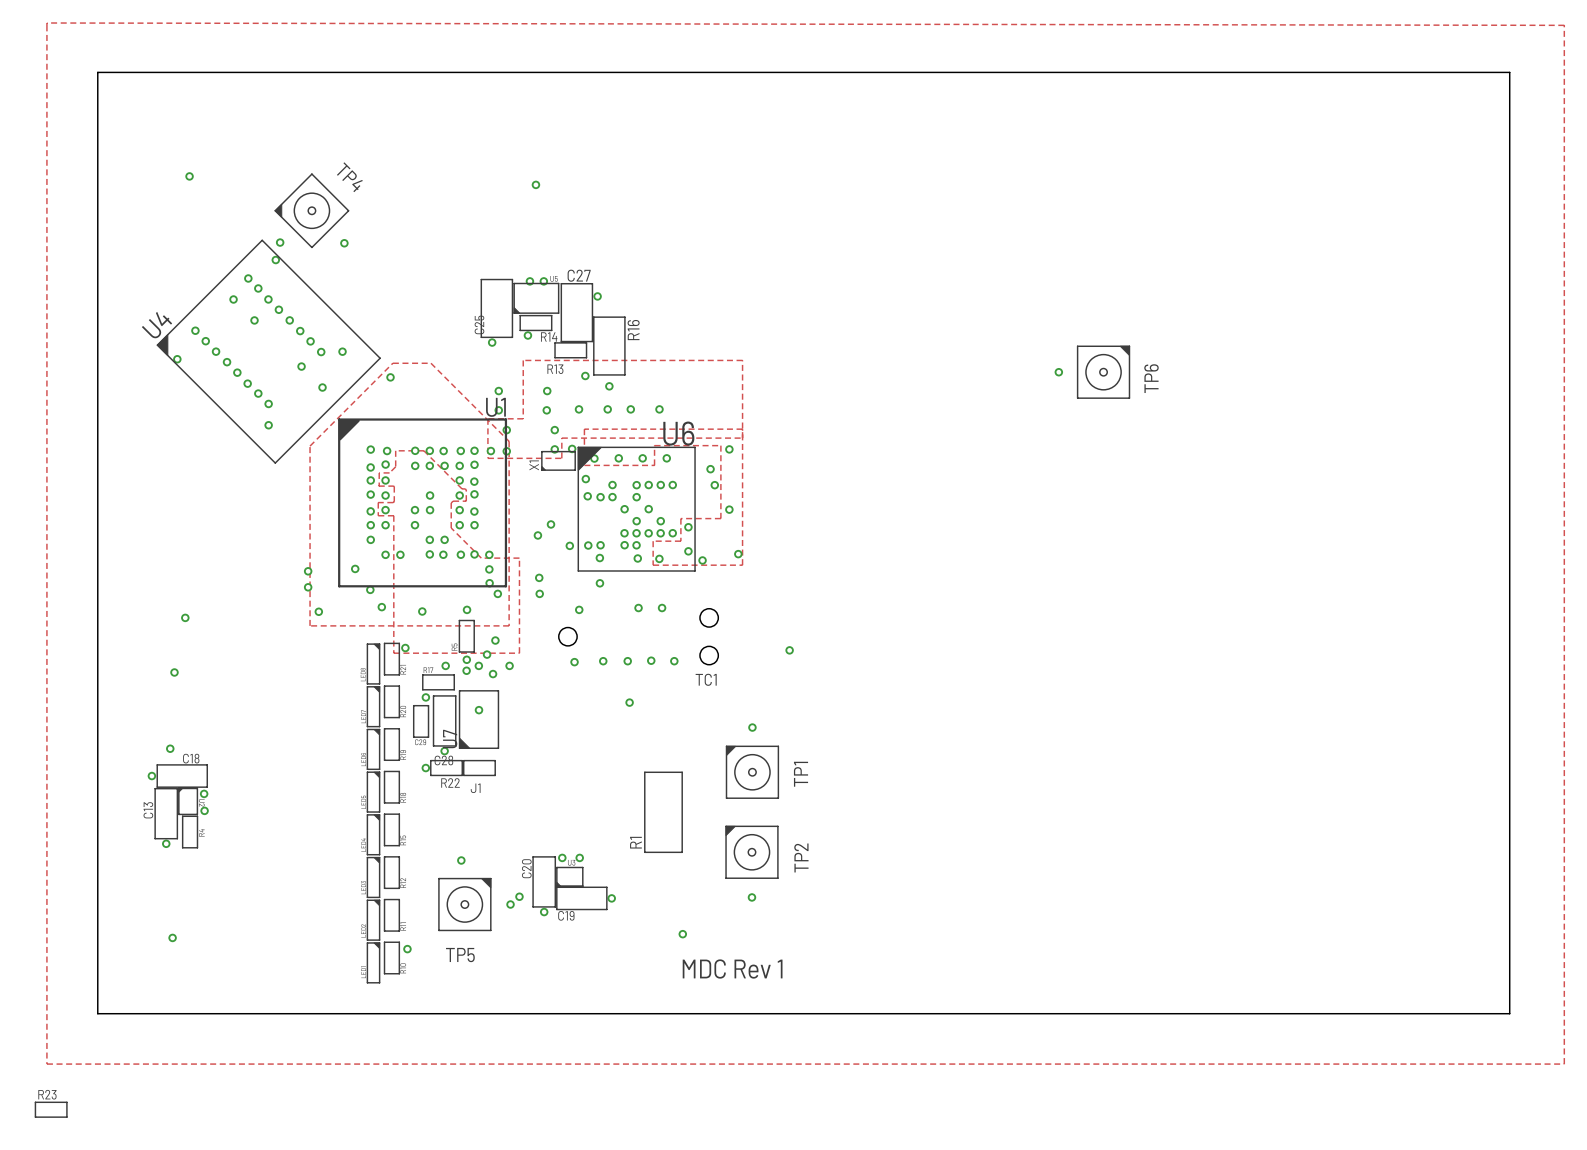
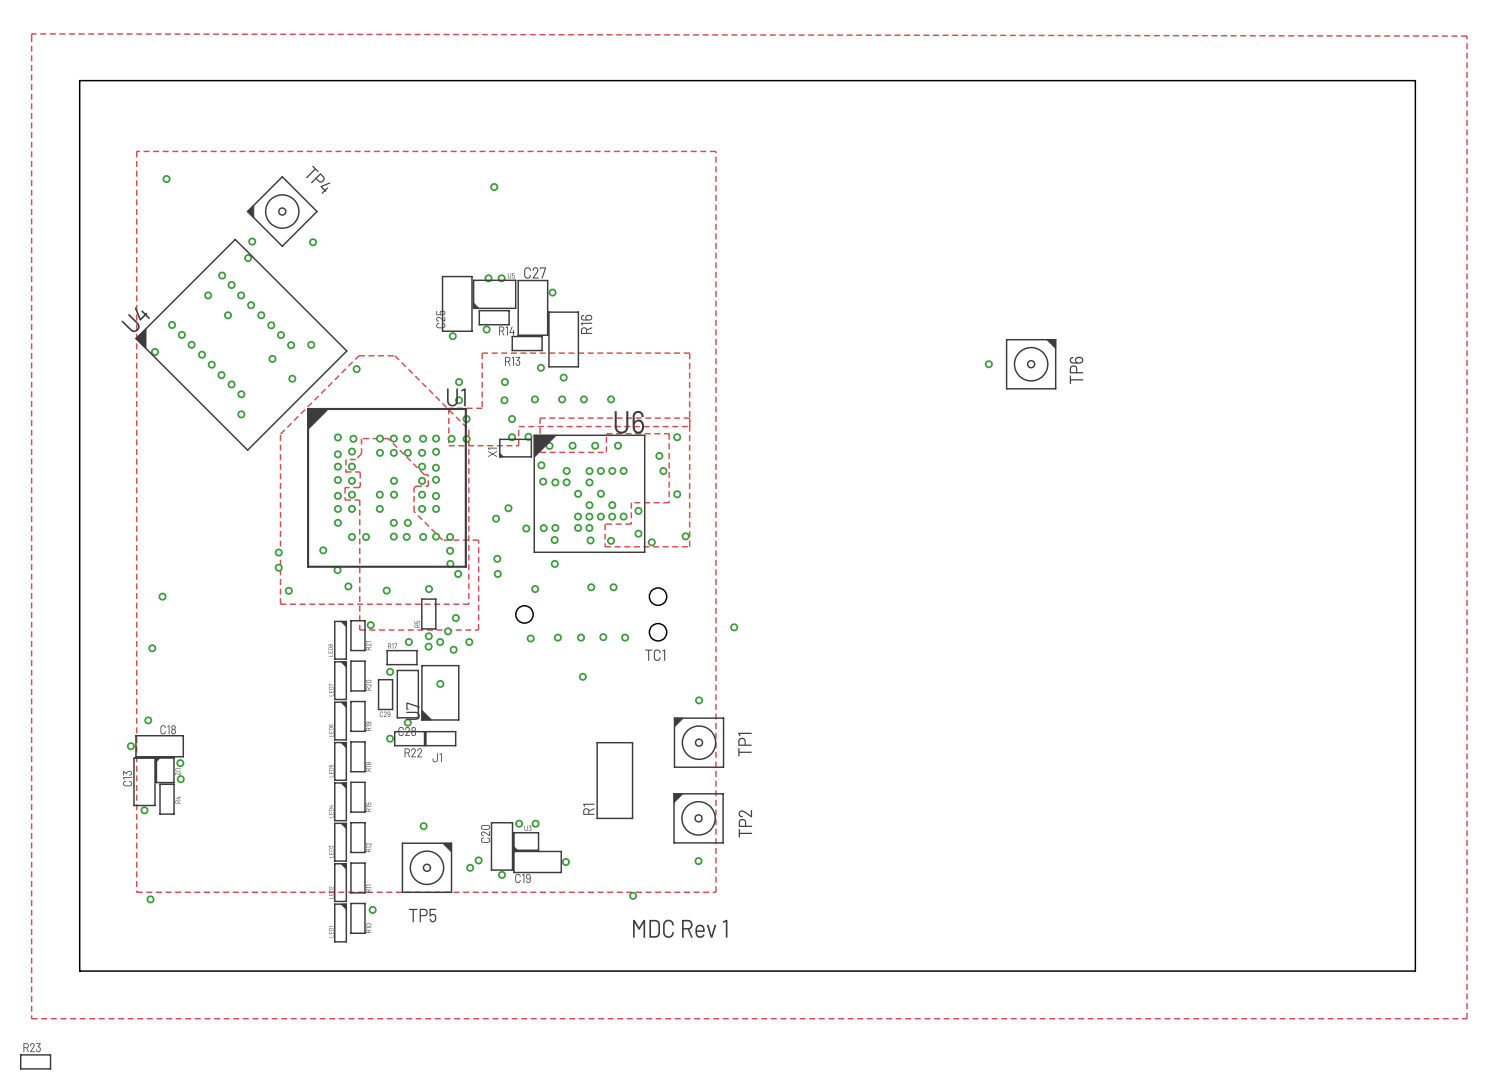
zone outline: none -> (136, 151) (136, 892) (715, 892) (715, 151) (136, 151)

